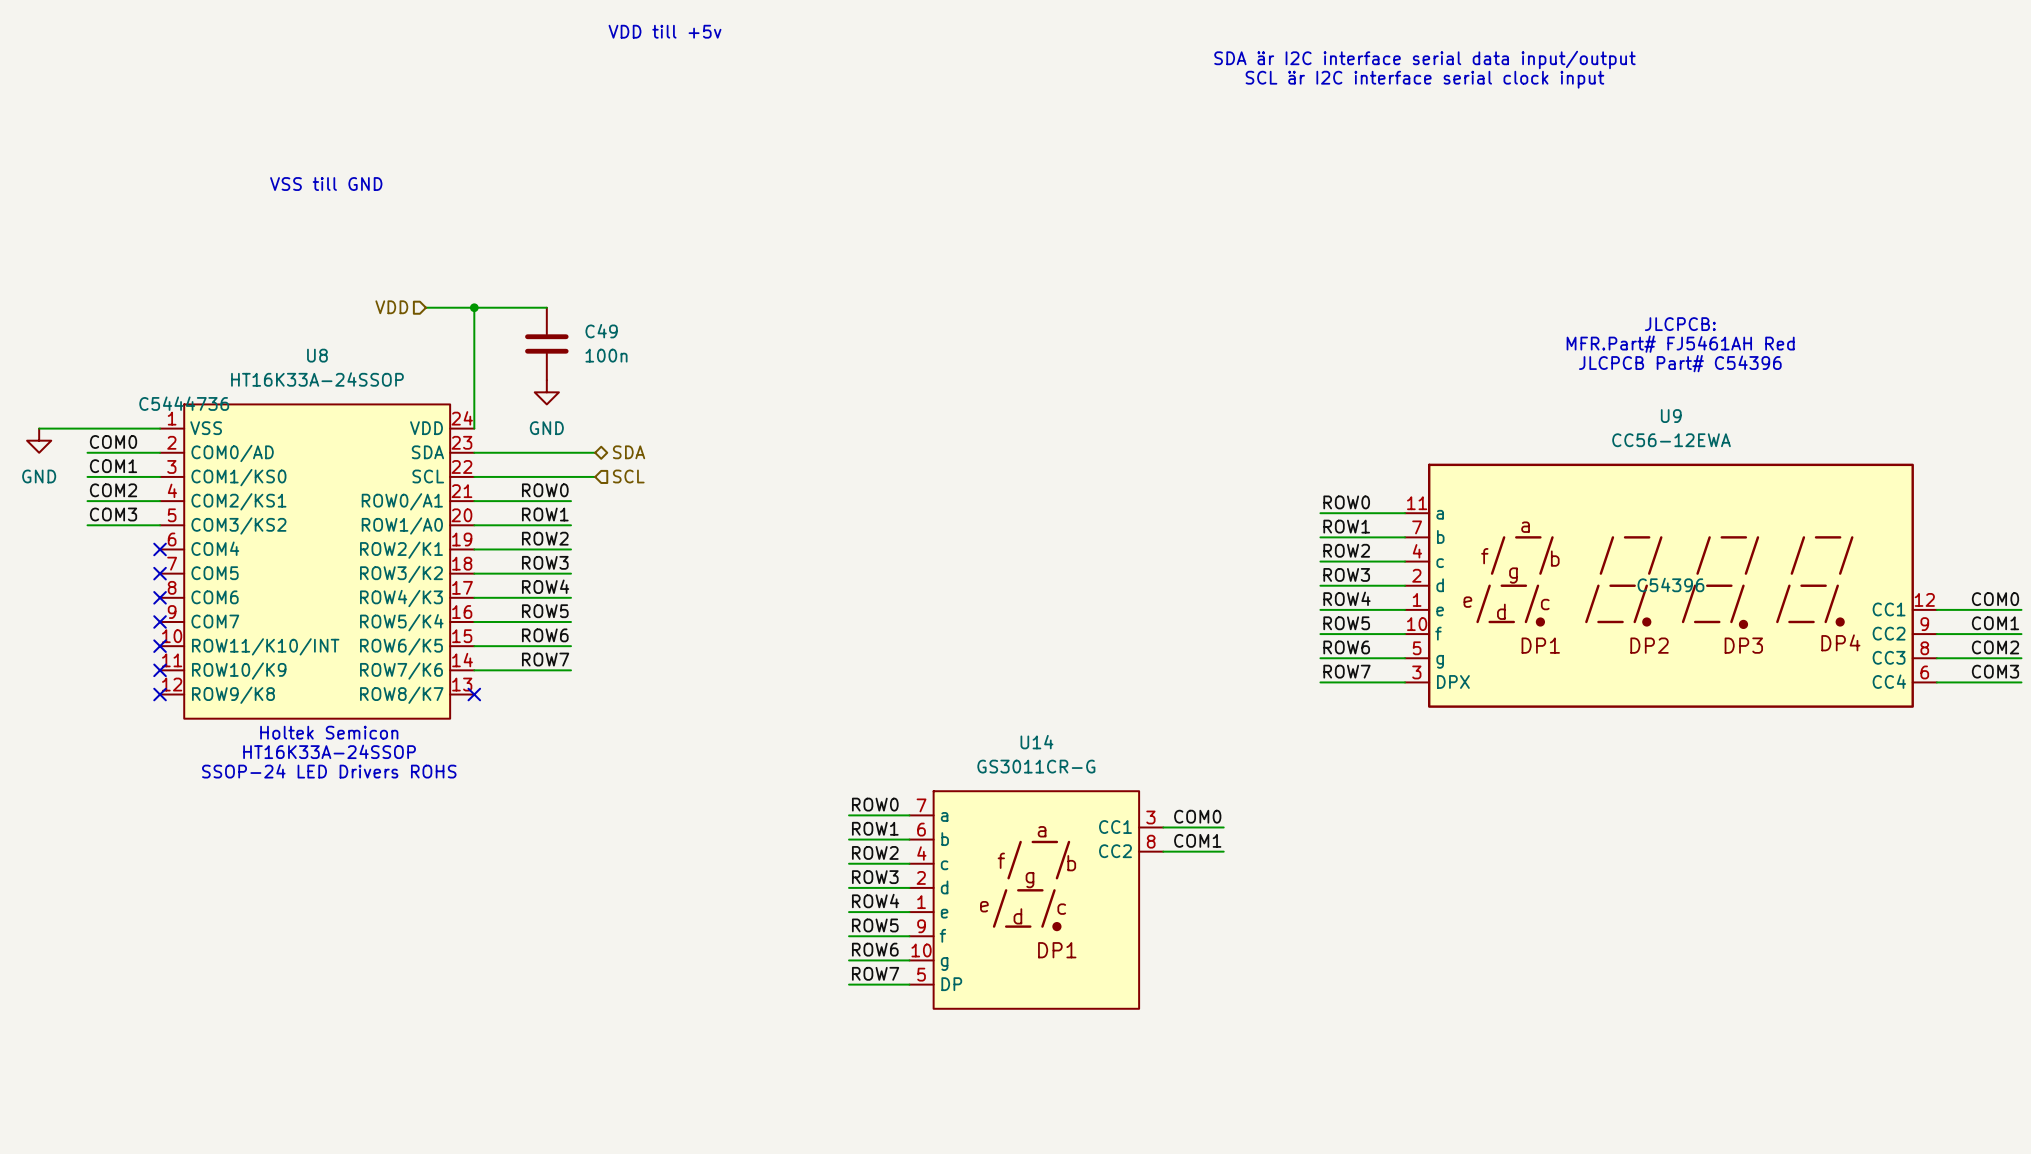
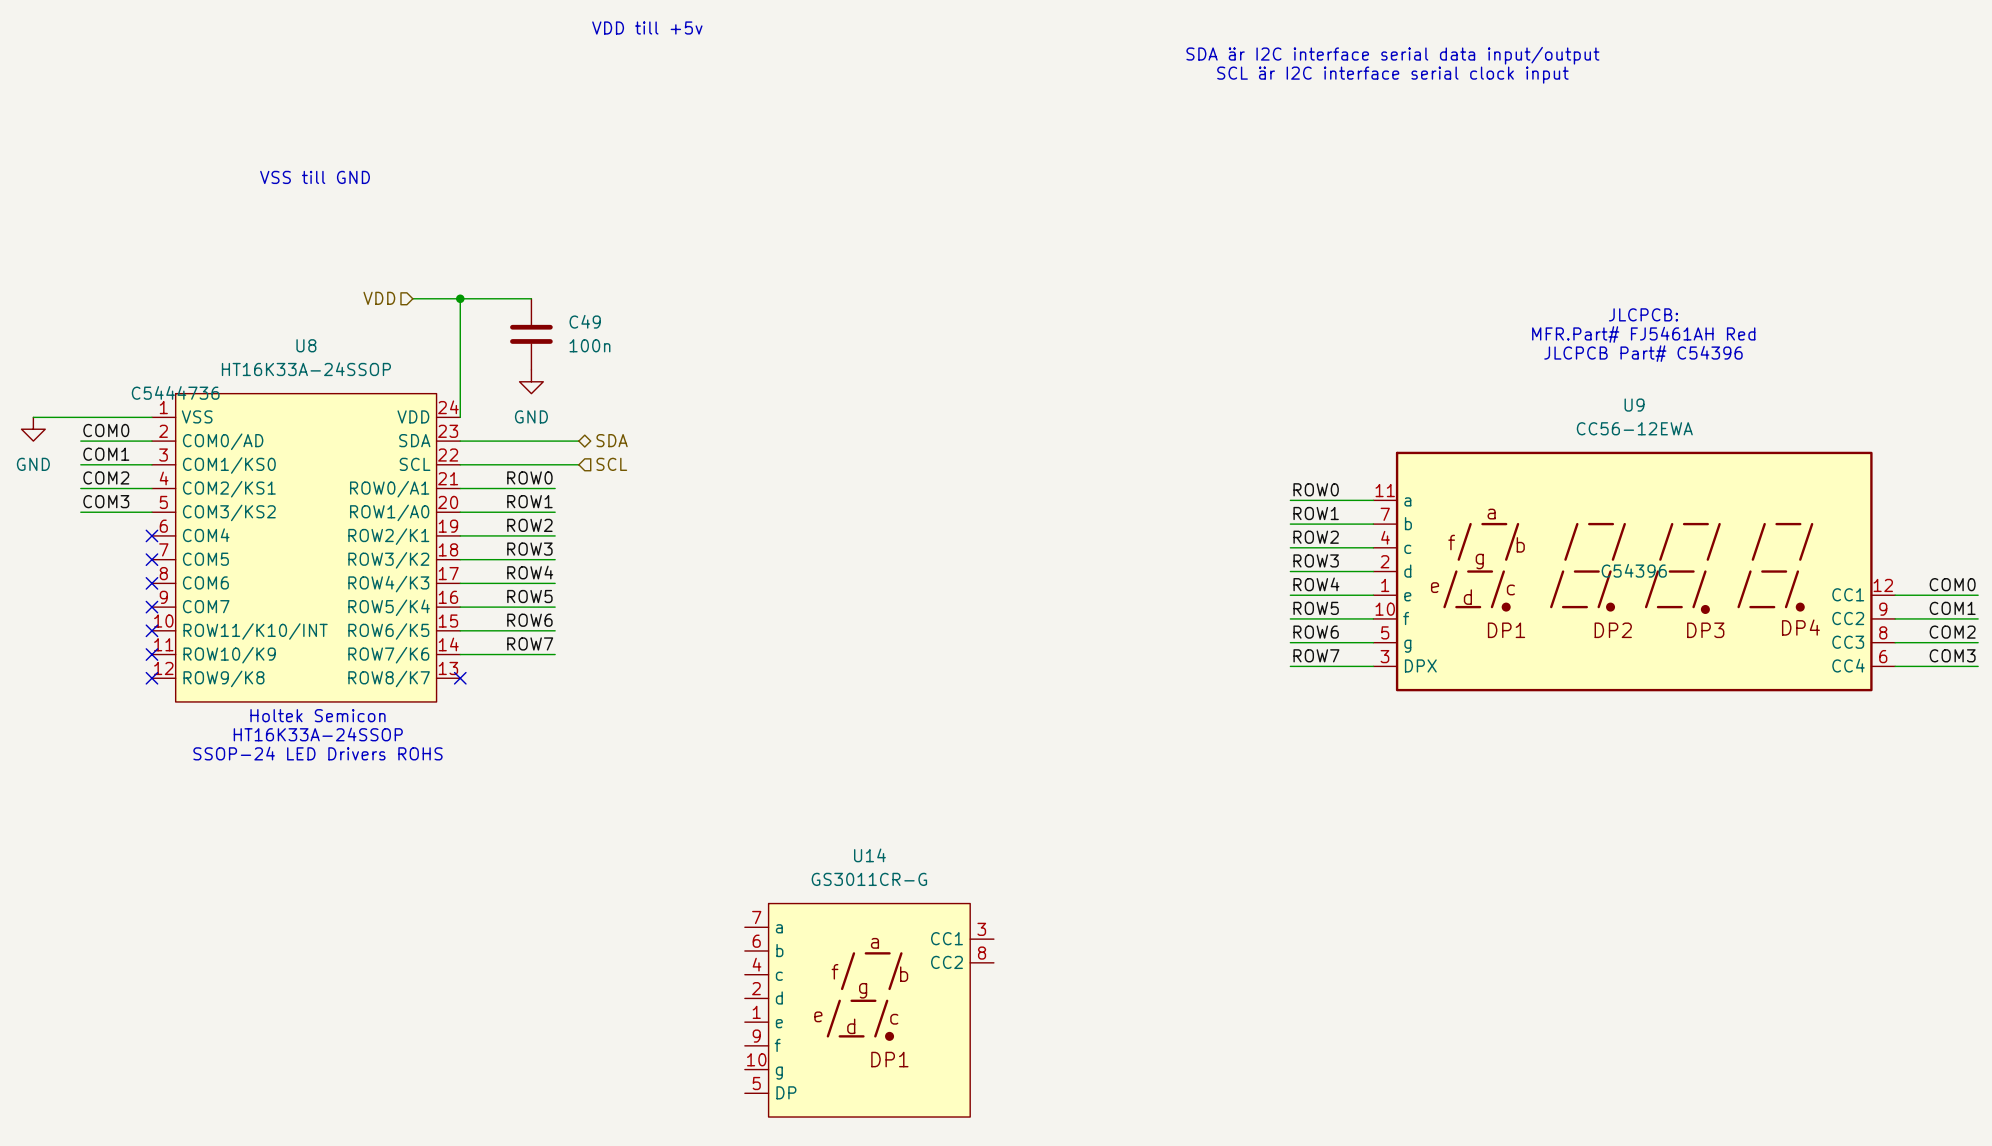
label: ROW0 (875, 804) -> none
wire: (849, 815) (909, 815) -> none
label: COM0 (1197, 816) -> none
wire: (1163, 827) (1223, 827) -> none
label: ROW1 (875, 828) -> none
wire: (849, 839) (909, 839) -> none
label: COM1 (1197, 840) -> none
wire: (1163, 851) (1223, 851) -> none
label: ROW2 (875, 852) -> none
wire: (849, 863) (909, 863) -> none
label: ROW3 (875, 877) -> none
wire: (849, 887) (909, 887) -> none
U14 position: (1036, 900) -> (869, 1010)
label: ROW4 (875, 901) -> none
wire: (849, 912) (909, 912) -> none
label: ROW5 (875, 925) -> none
label: ROW6 (875, 949) -> none
label: ROW7 (875, 973) -> none

